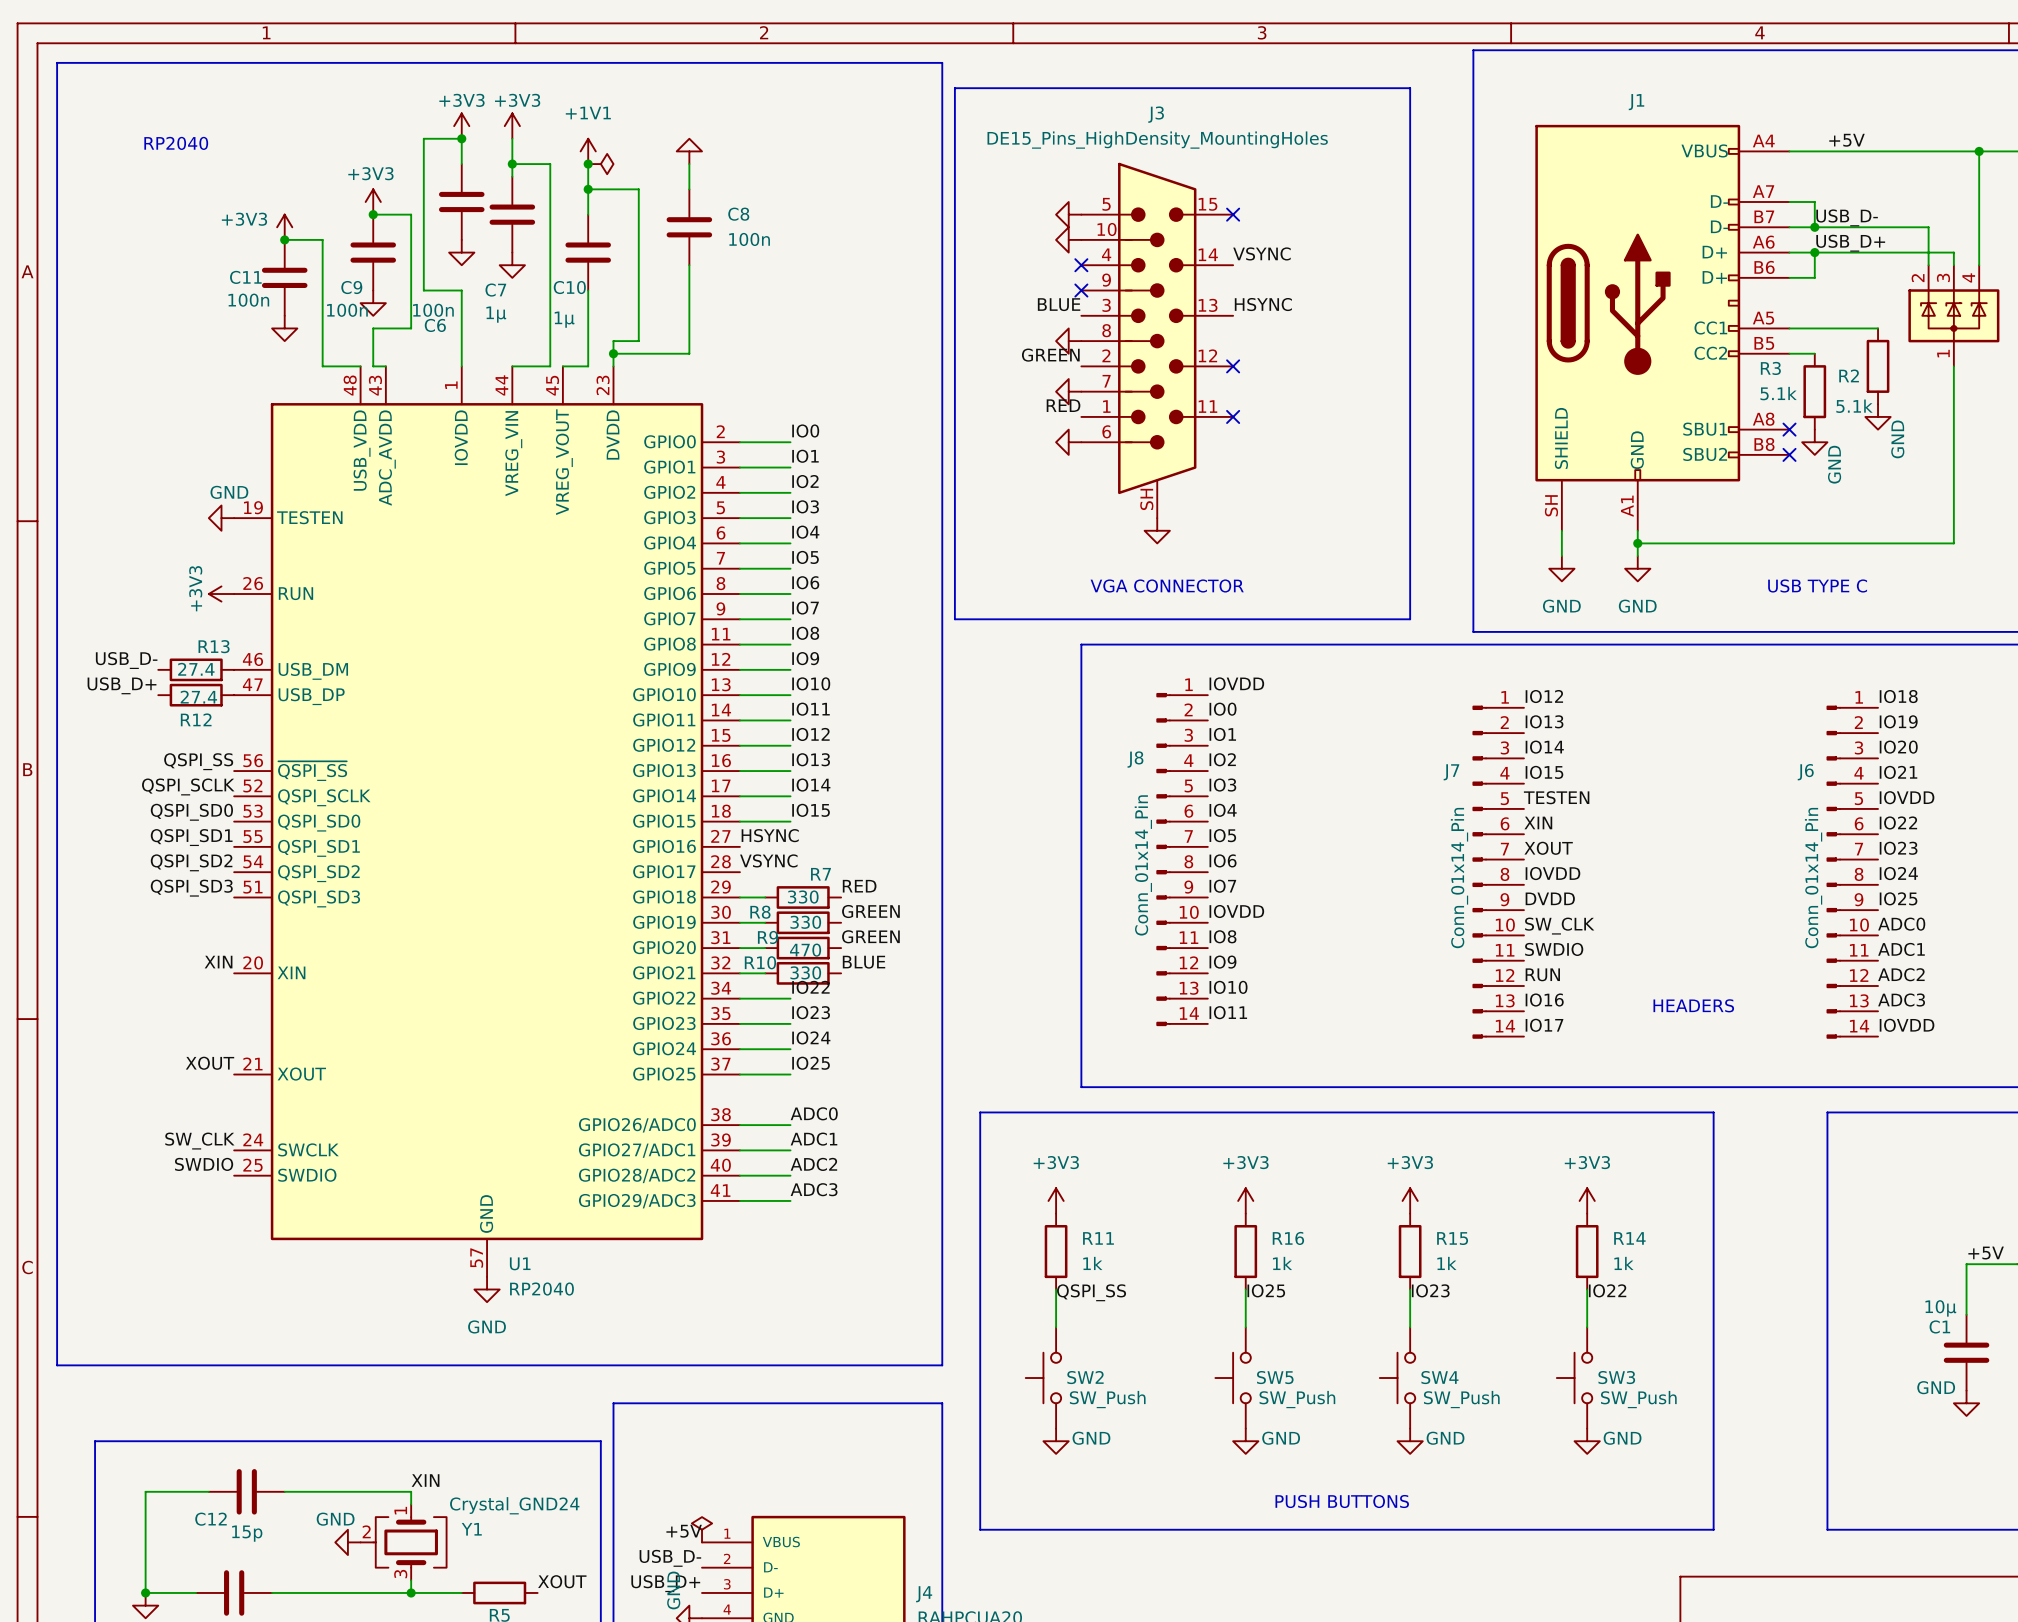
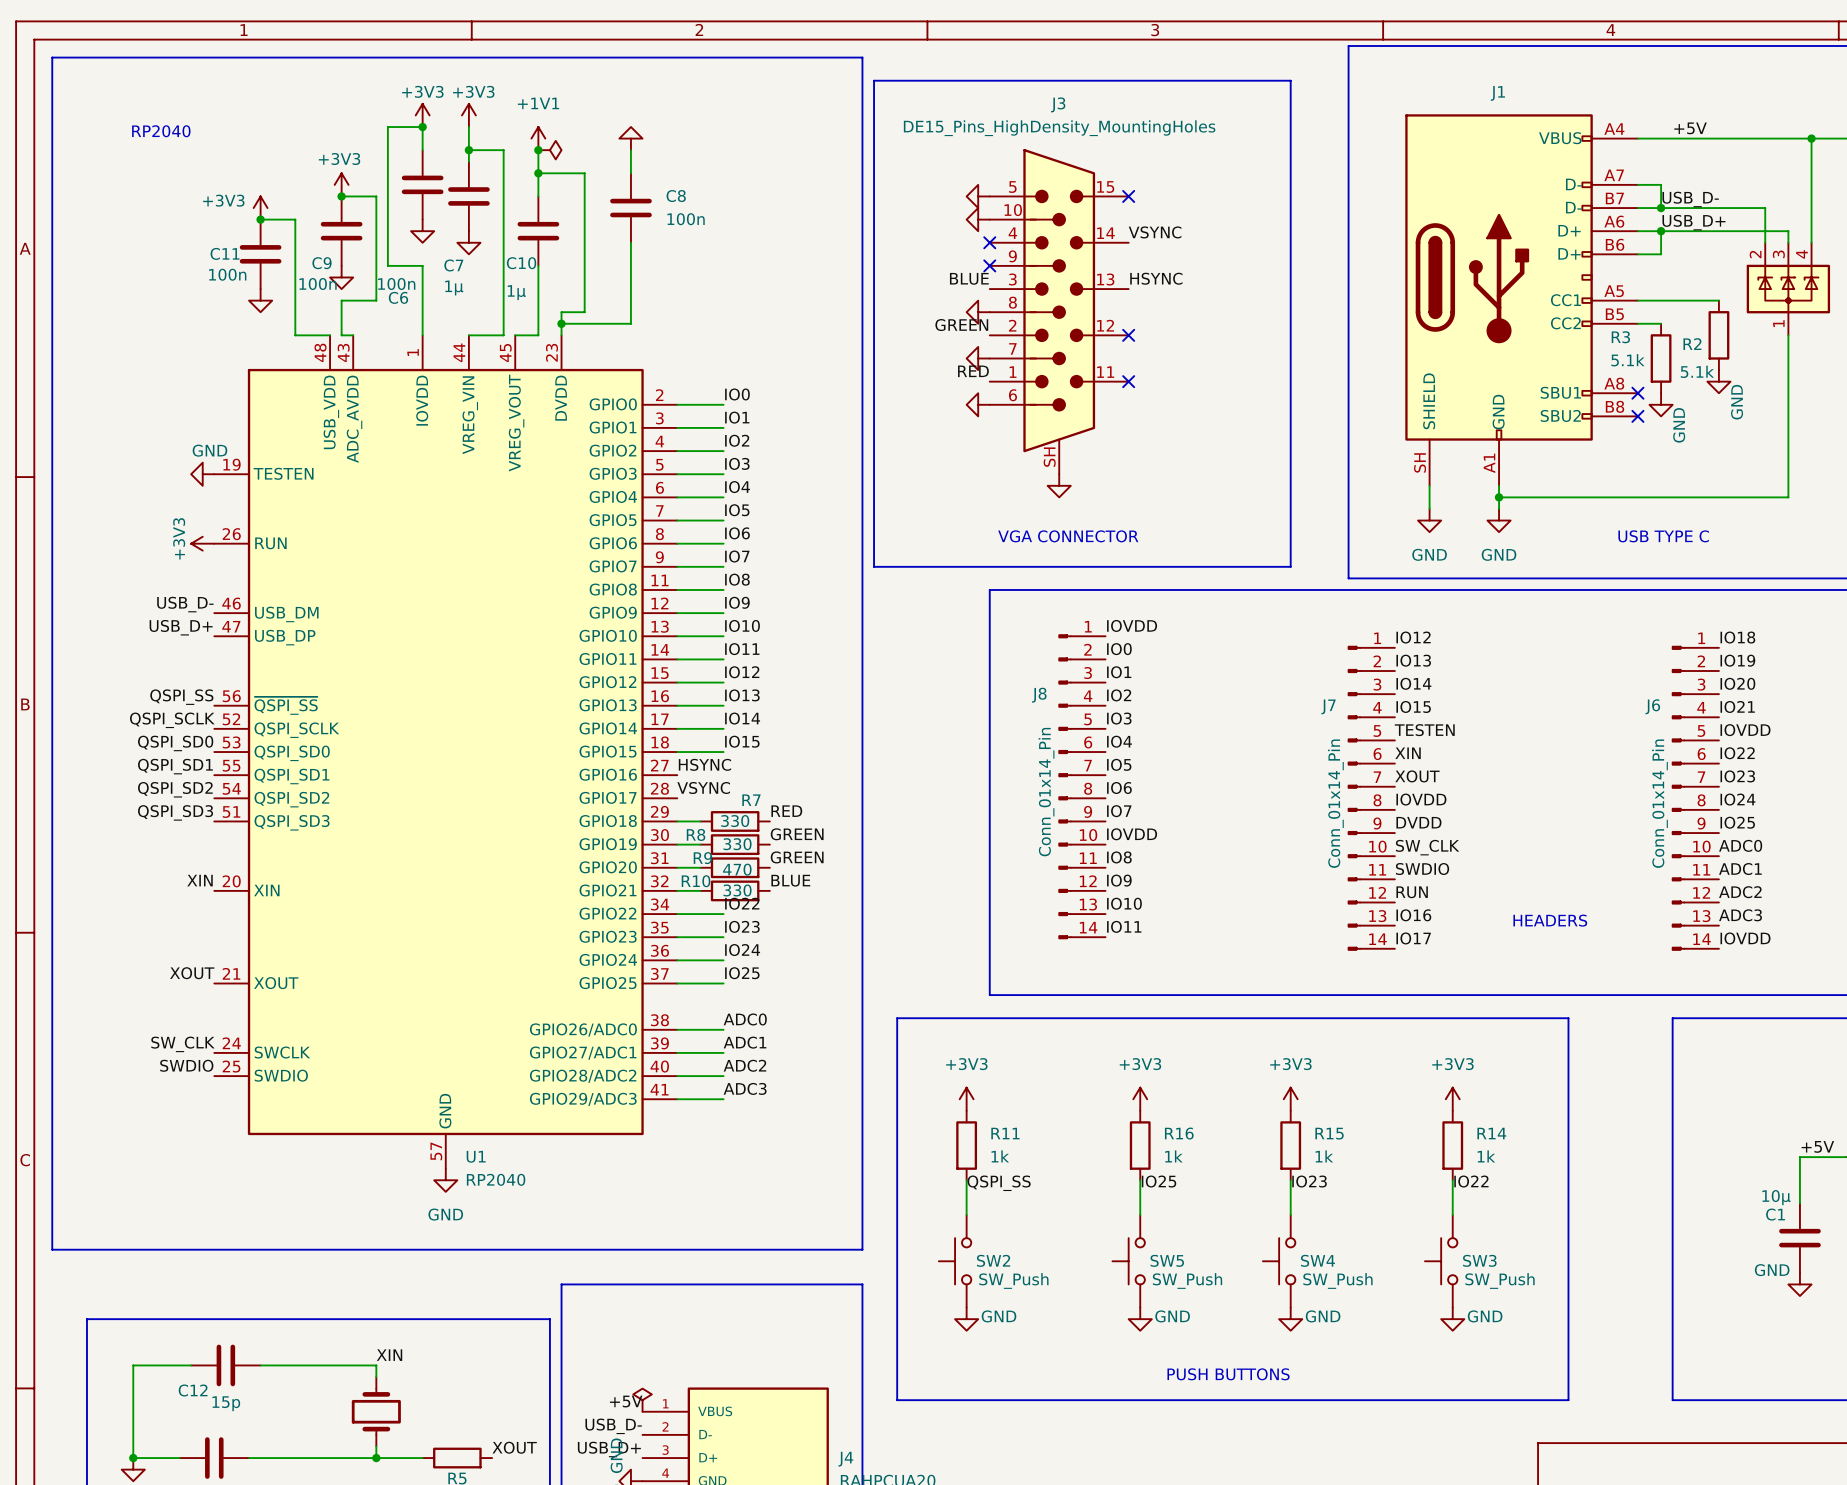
label position: USB_D- (126, 660) -> USB_D- (185, 604)
R13: 27.4 (196, 669) -> none
label position: USB_D+ (122, 685) -> USB_D+ (181, 627)
R12: 27.4 (196, 695) -> none
power symbol: GND (347, 1542) -> none
Y1: Crystal_GND24 (403, 1542) -> none
part: none -> (376, 1411)

